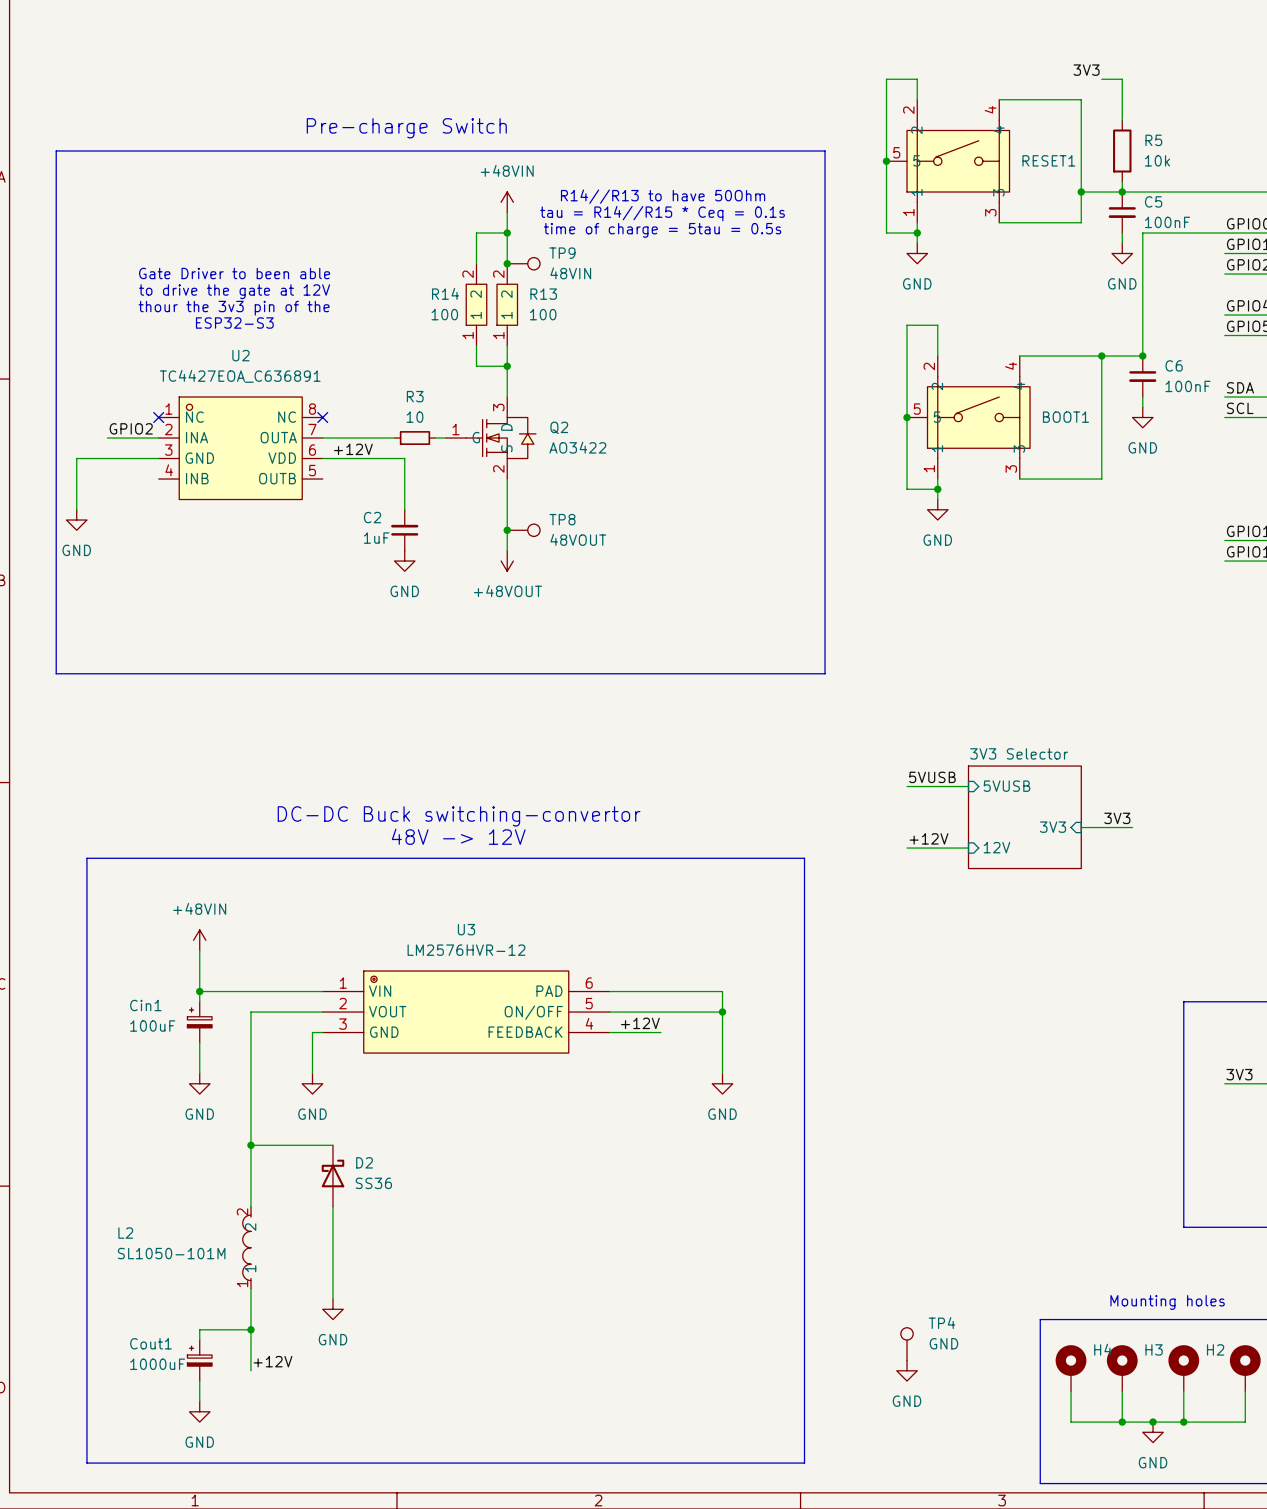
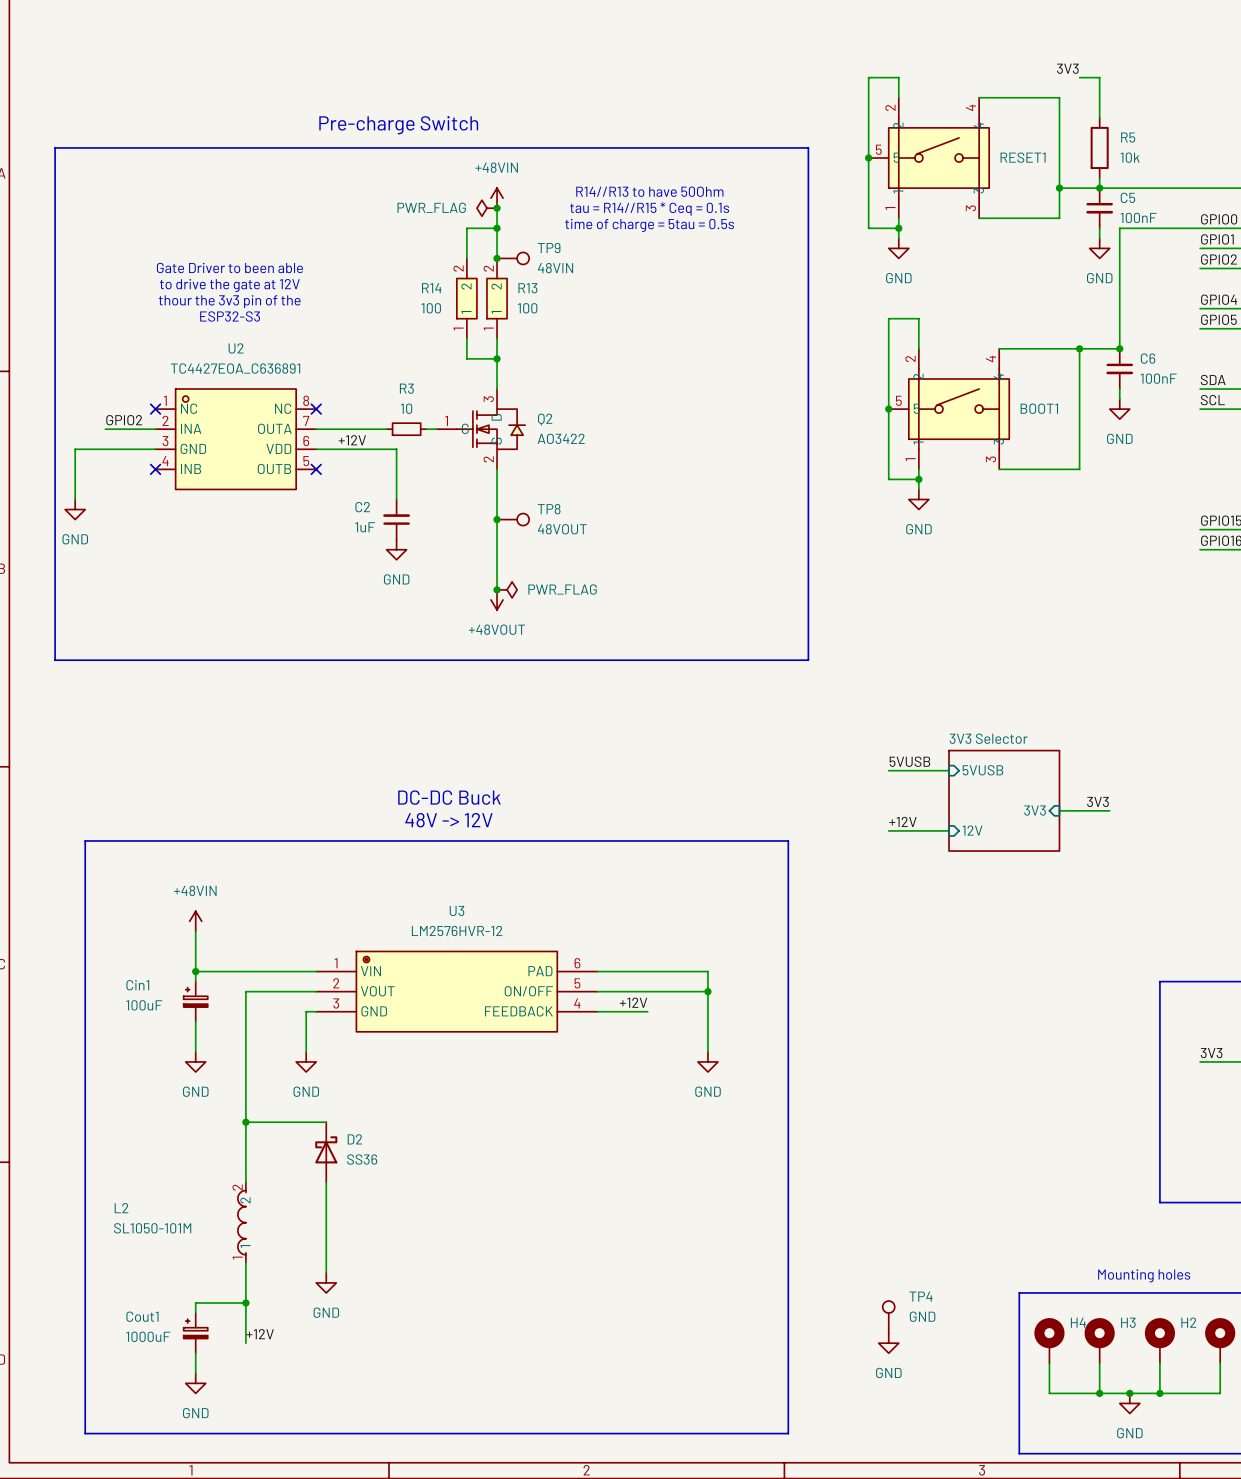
power symbol: none -> PWR_FLAG (486, 208)
junction: none -> (497, 208)
no-connect mark: none -> (155, 469)
no-connect mark: none -> (316, 469)
wire: none -> (497, 539) (497, 589)
power symbol position: +48VOUT (507, 561) -> +48VOUT (497, 599)
junction: none -> (497, 589)
power symbol: none -> PWR_FLAG (507, 589)
text: DC-DC Buck switching-convertor (459, 816) -> DC-DC Buck (449, 797)

